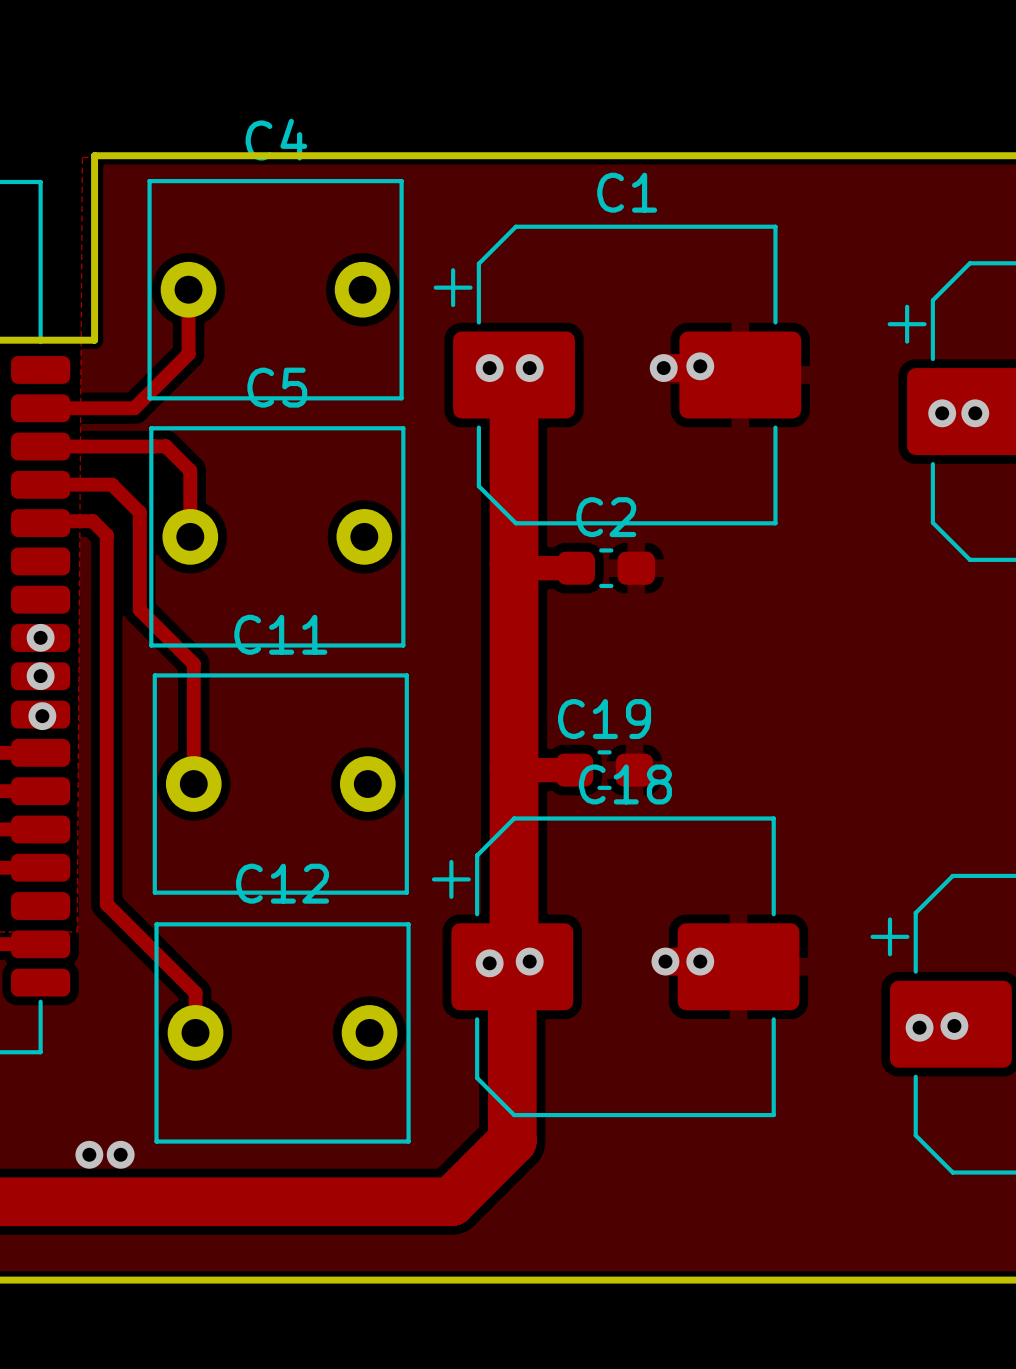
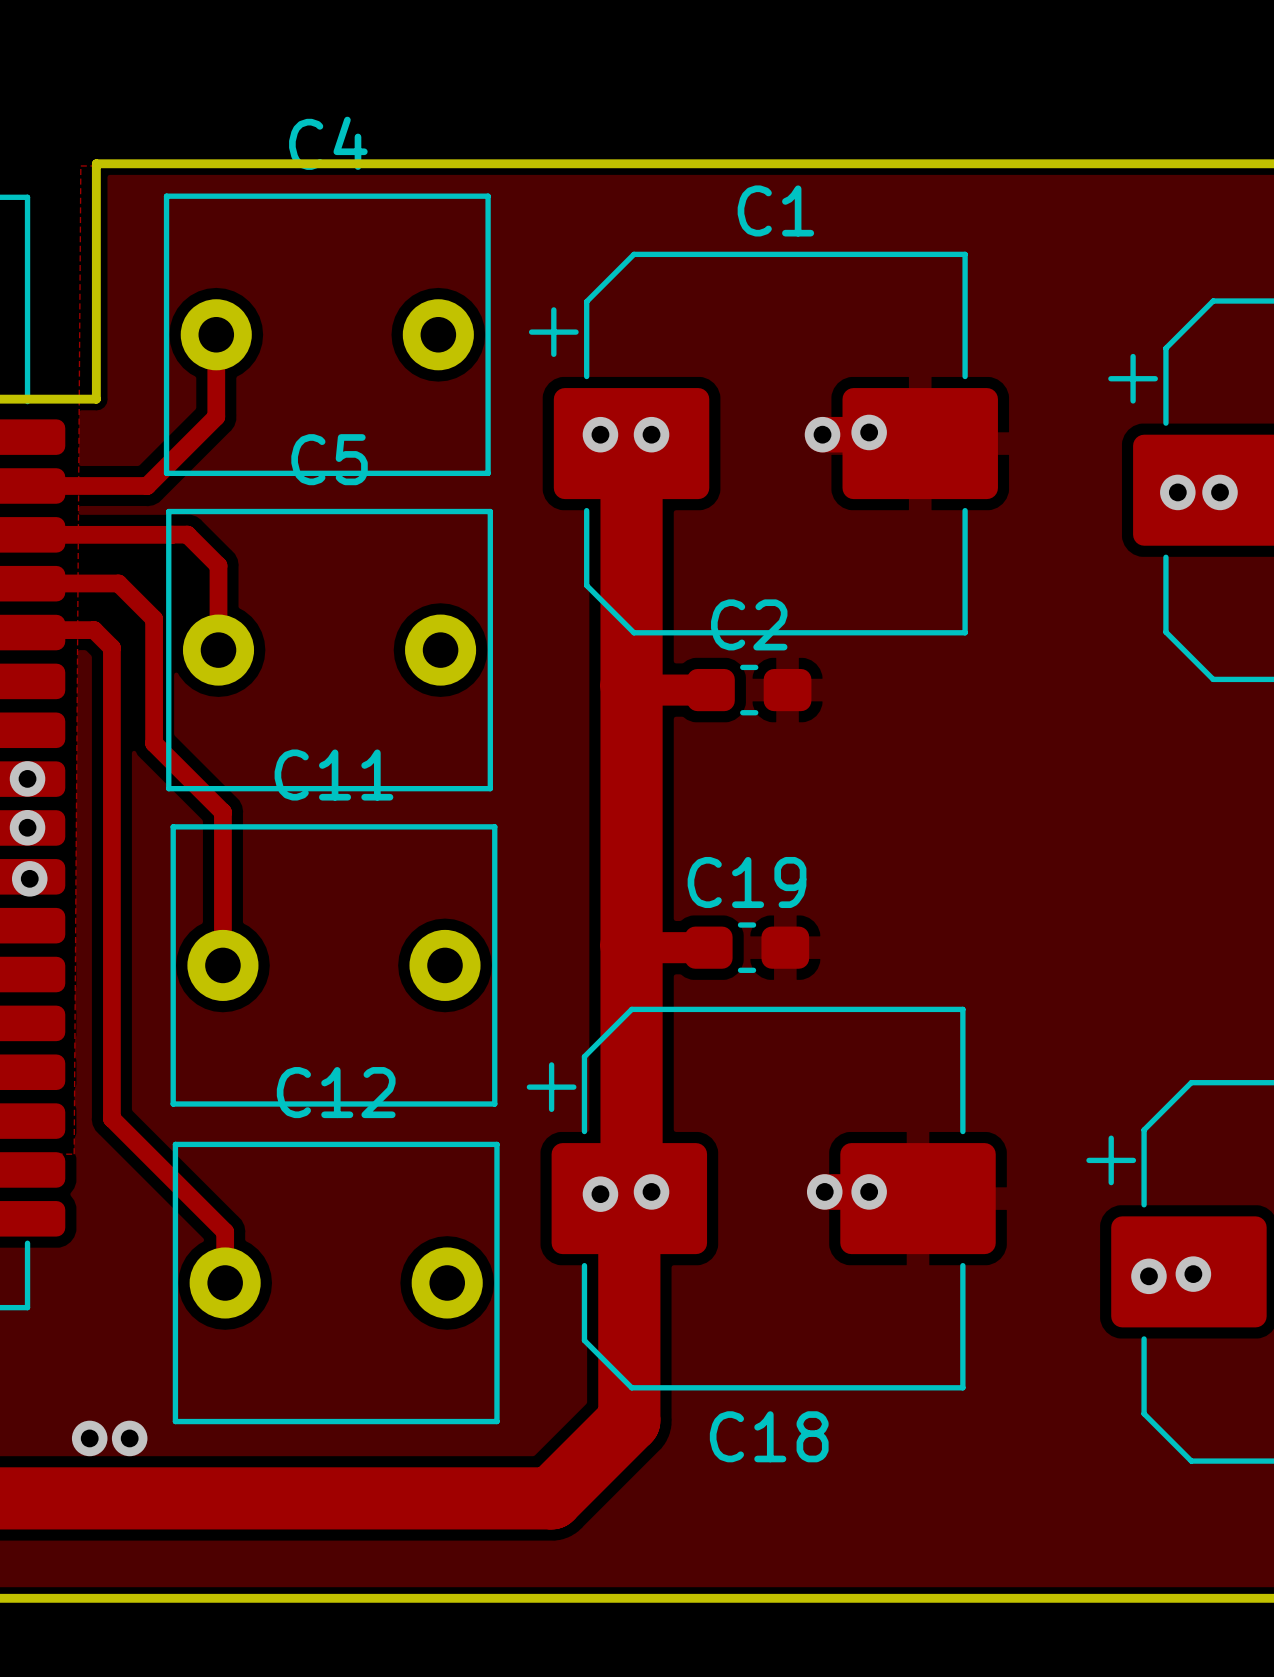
C18 name position: C18 (625, 784) -> C18 (769, 1436)

